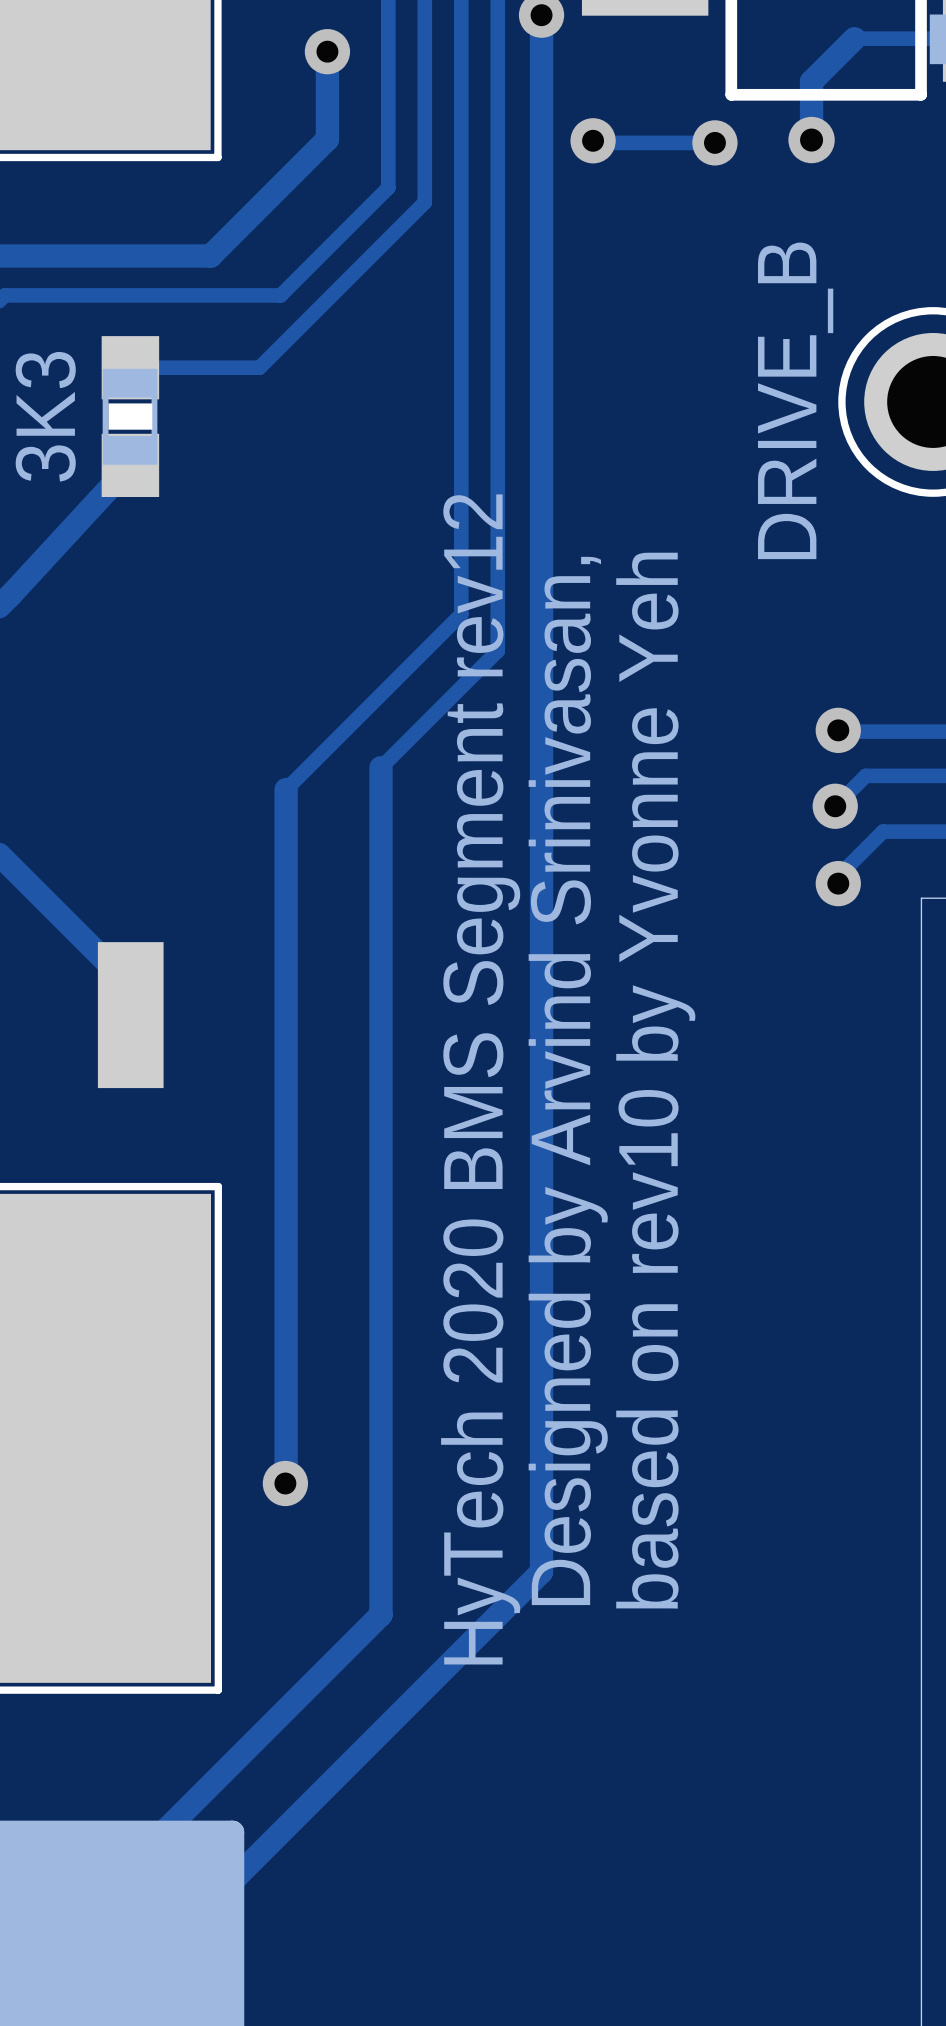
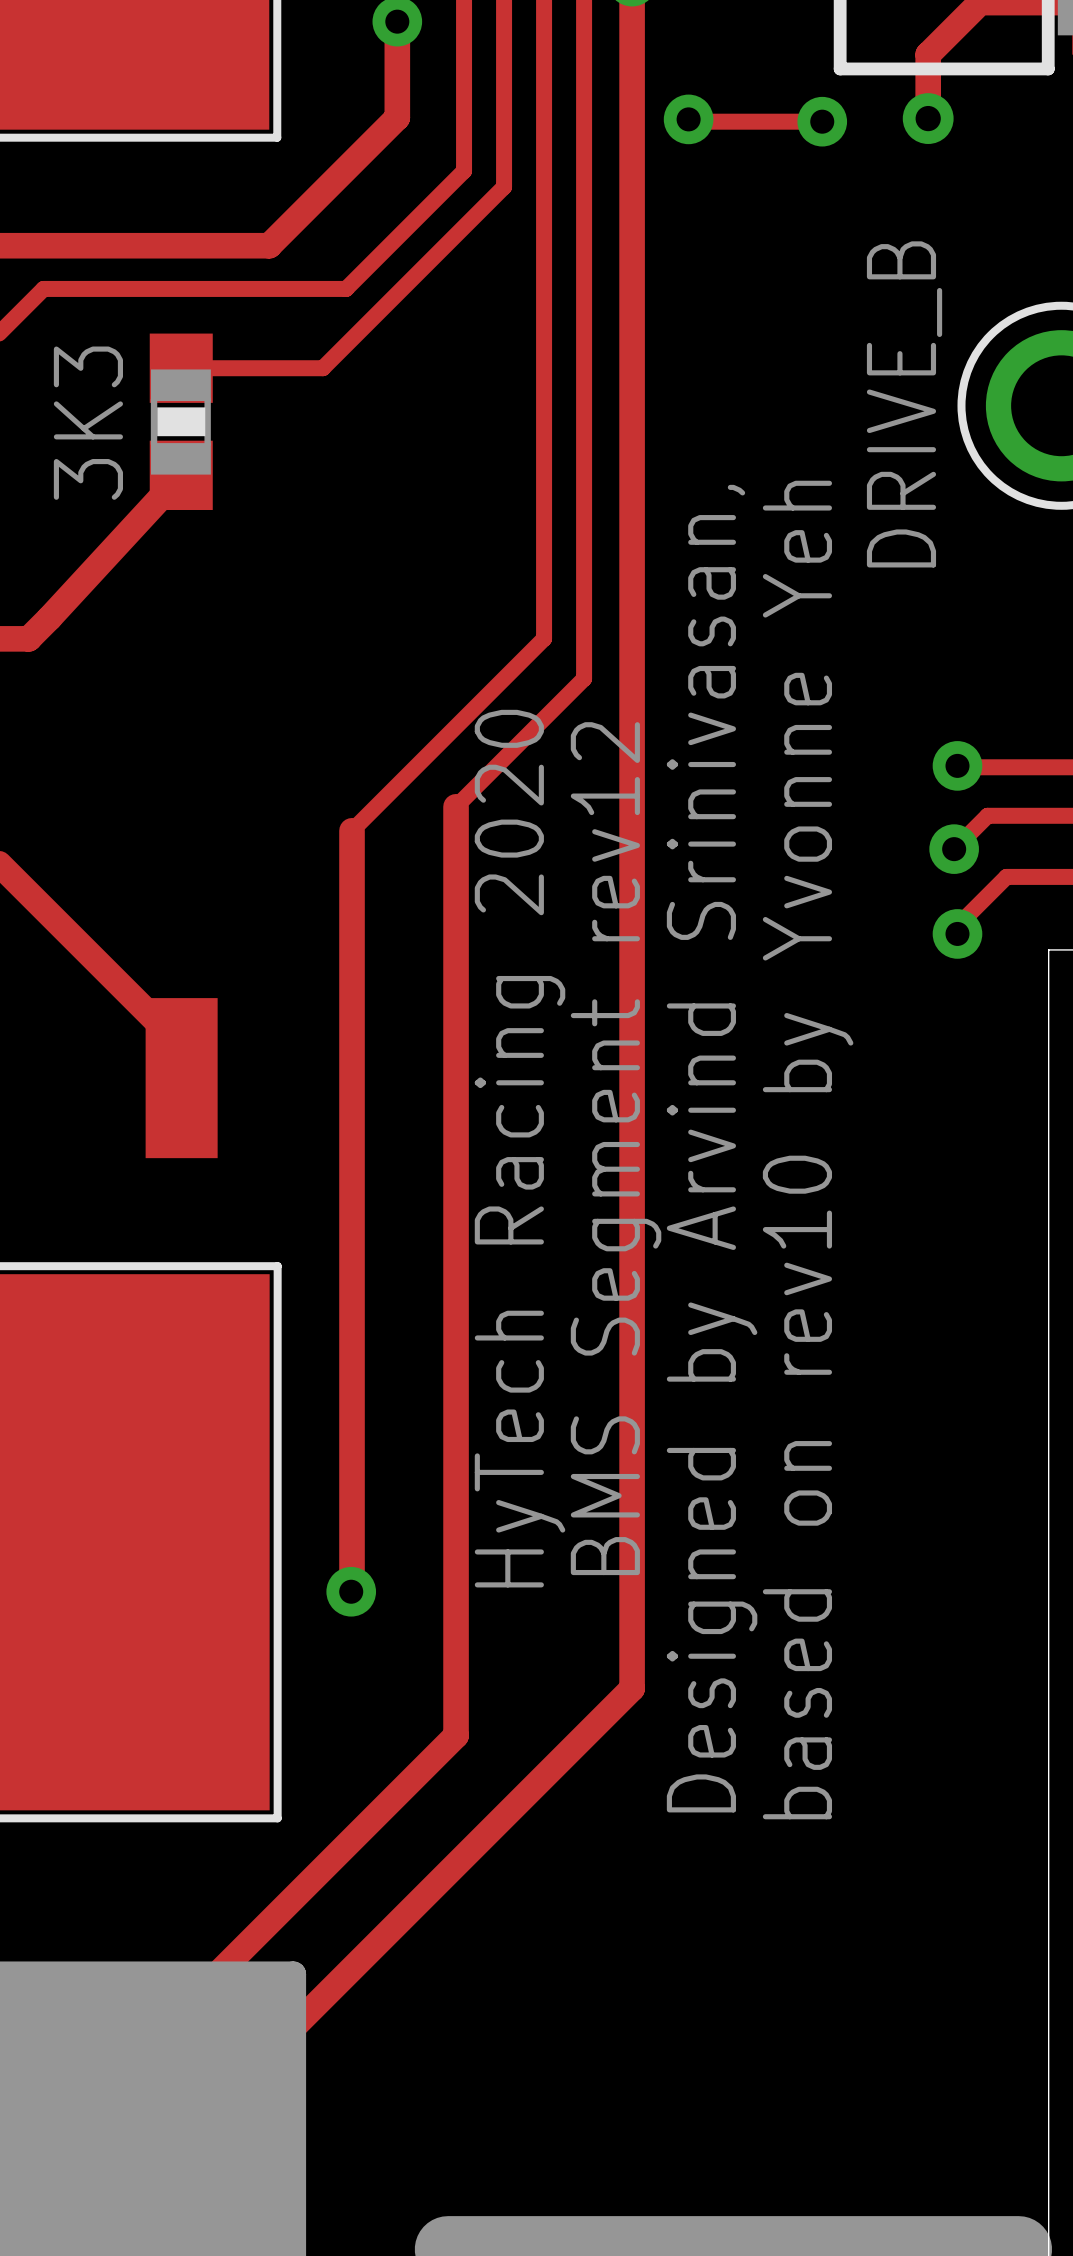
text: none -> HyTech Racing 2020 (520, 1148)
text: HyTech 2020 BMS Segment rev12 (480, 1079) -> BMS Segment rev12 (616, 1148)
text position: Designed by Arvind Srinivasan, (568, 1080) -> Designed by Arvind Srinivasan, (712, 1148)
text position: based on rev10 by Yvonne Yeh (655, 1080) -> based on rev10 by Yvonne Yeh (808, 1150)

